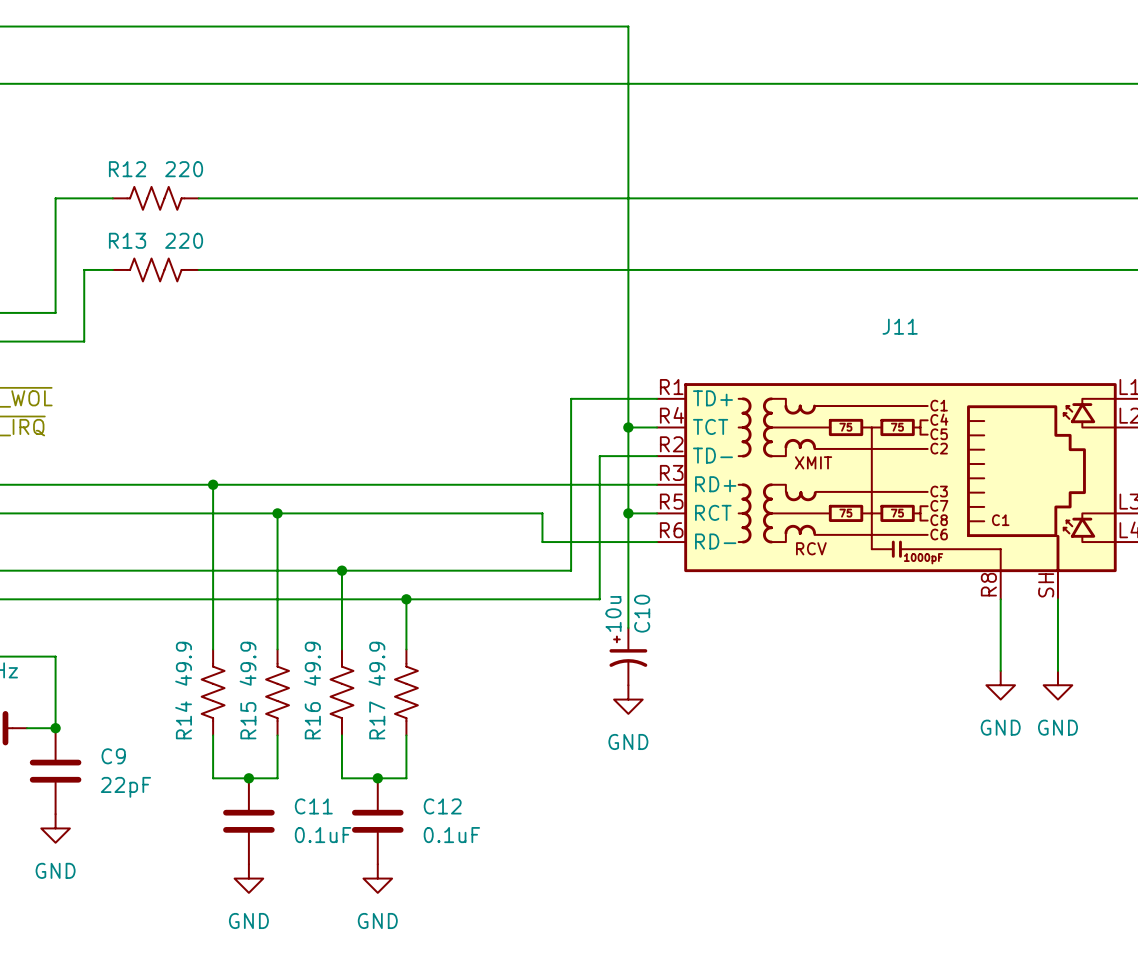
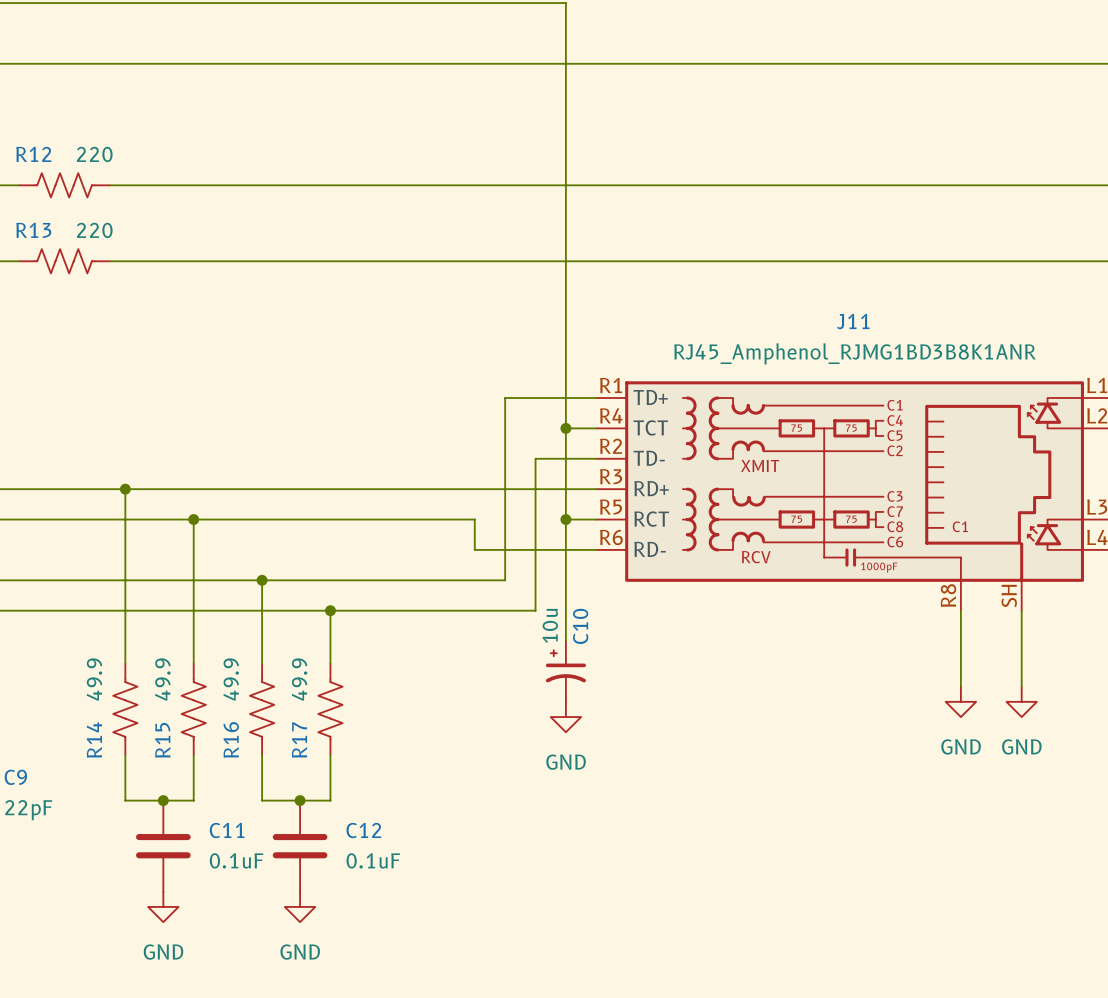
J11 value: none -> RJ45_Amphenol_RJMG1BD3B8K1ANR (855, 353)

